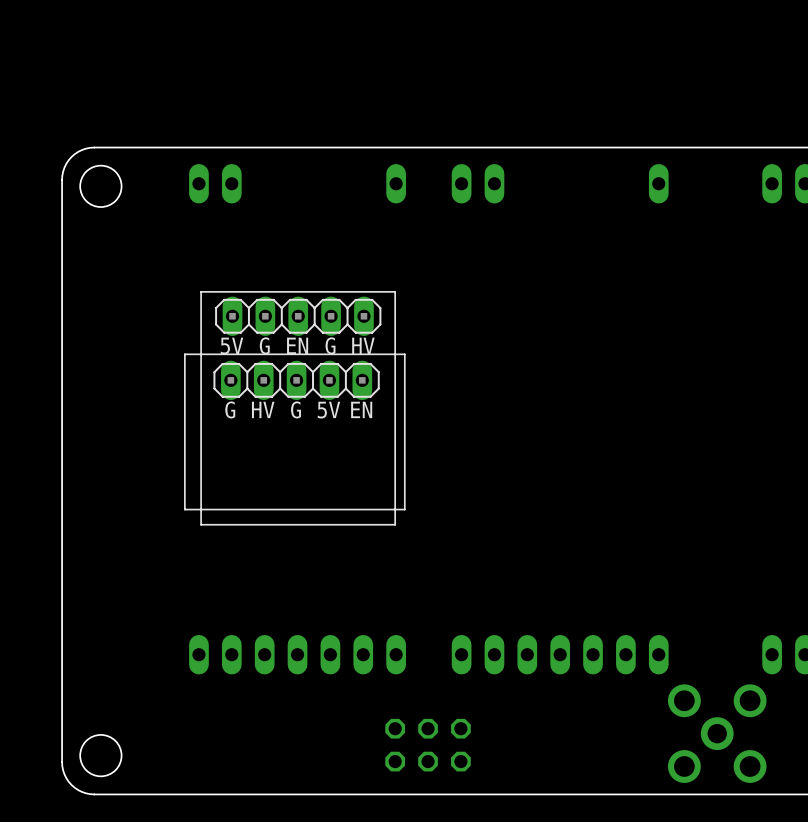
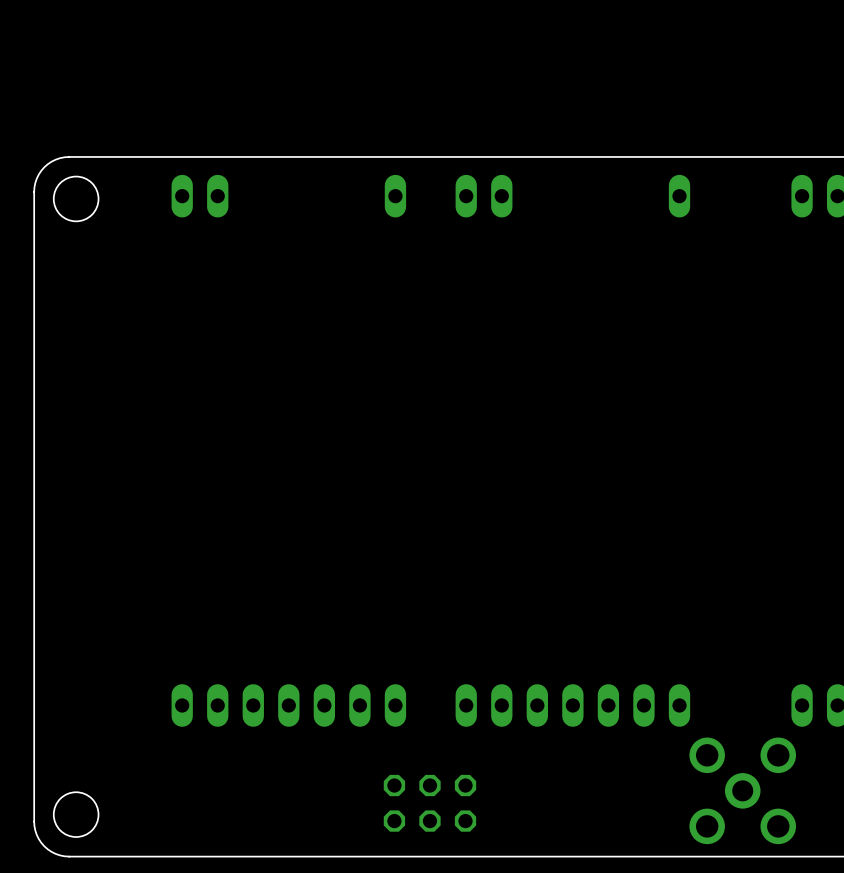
part: (298, 408) -> none
part: (294, 431) -> none

